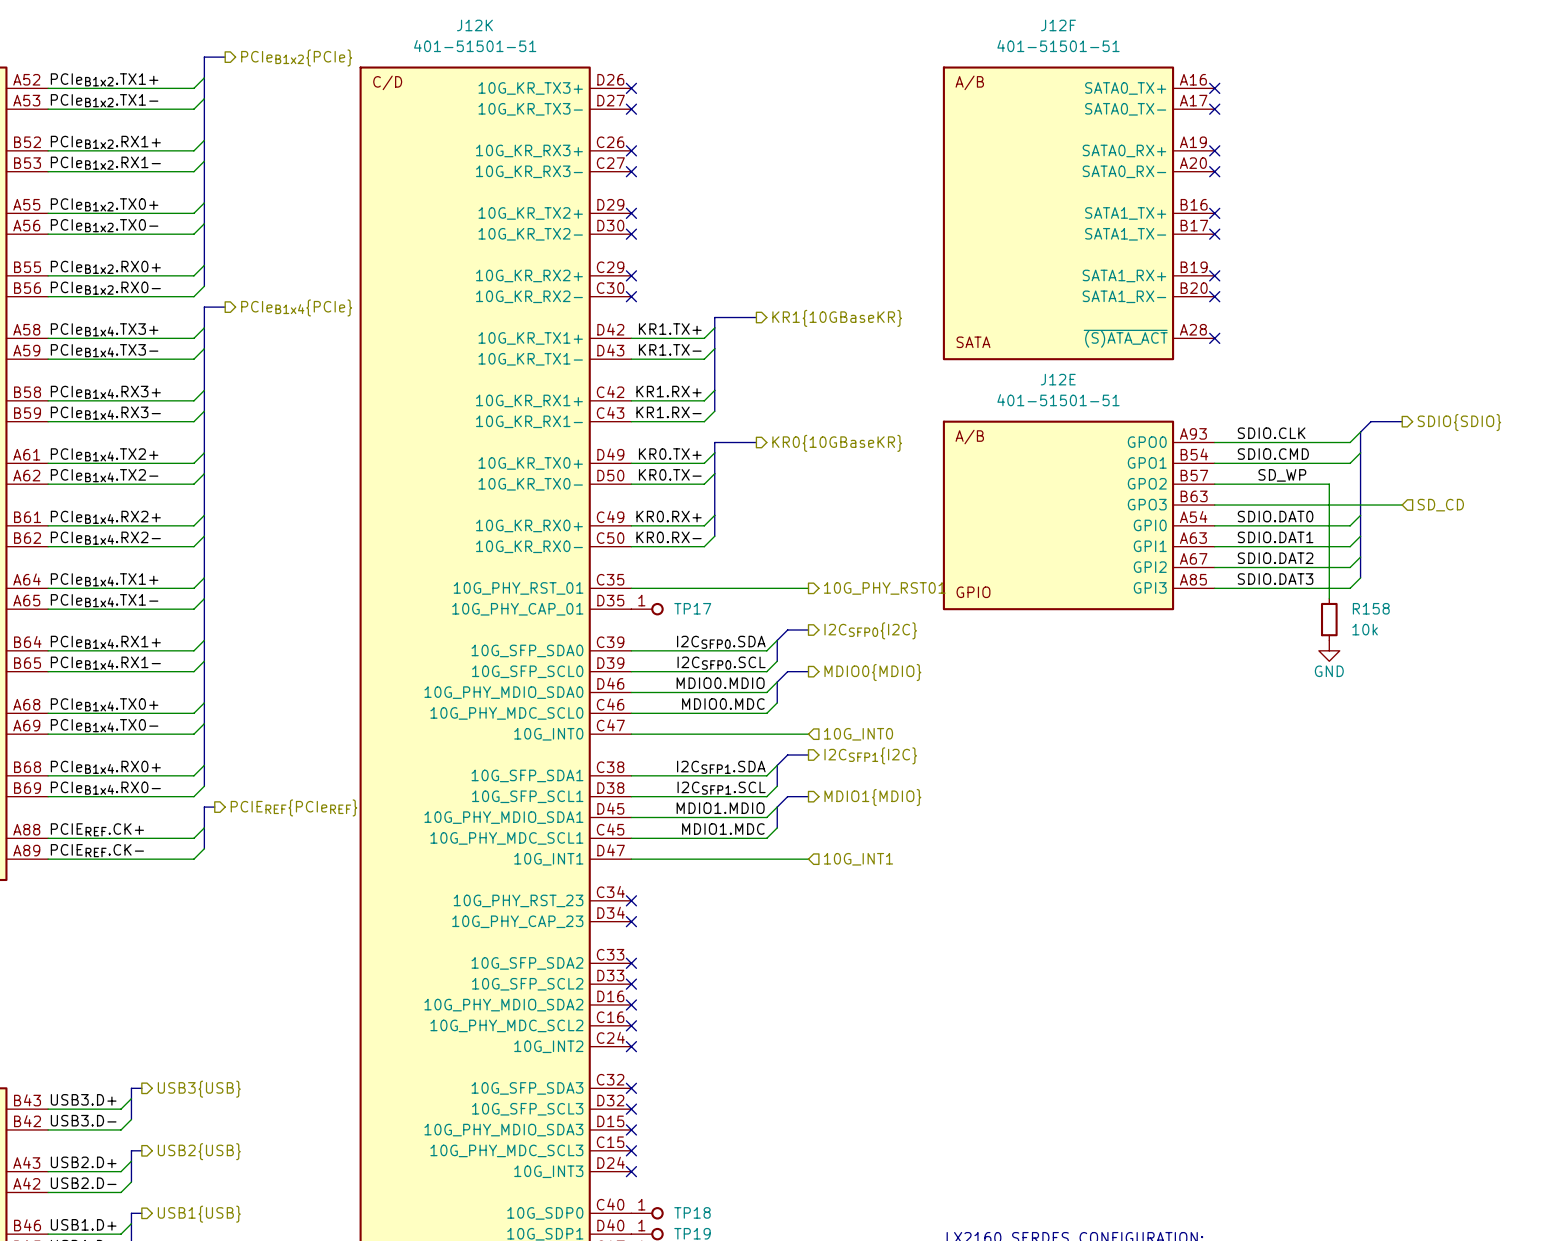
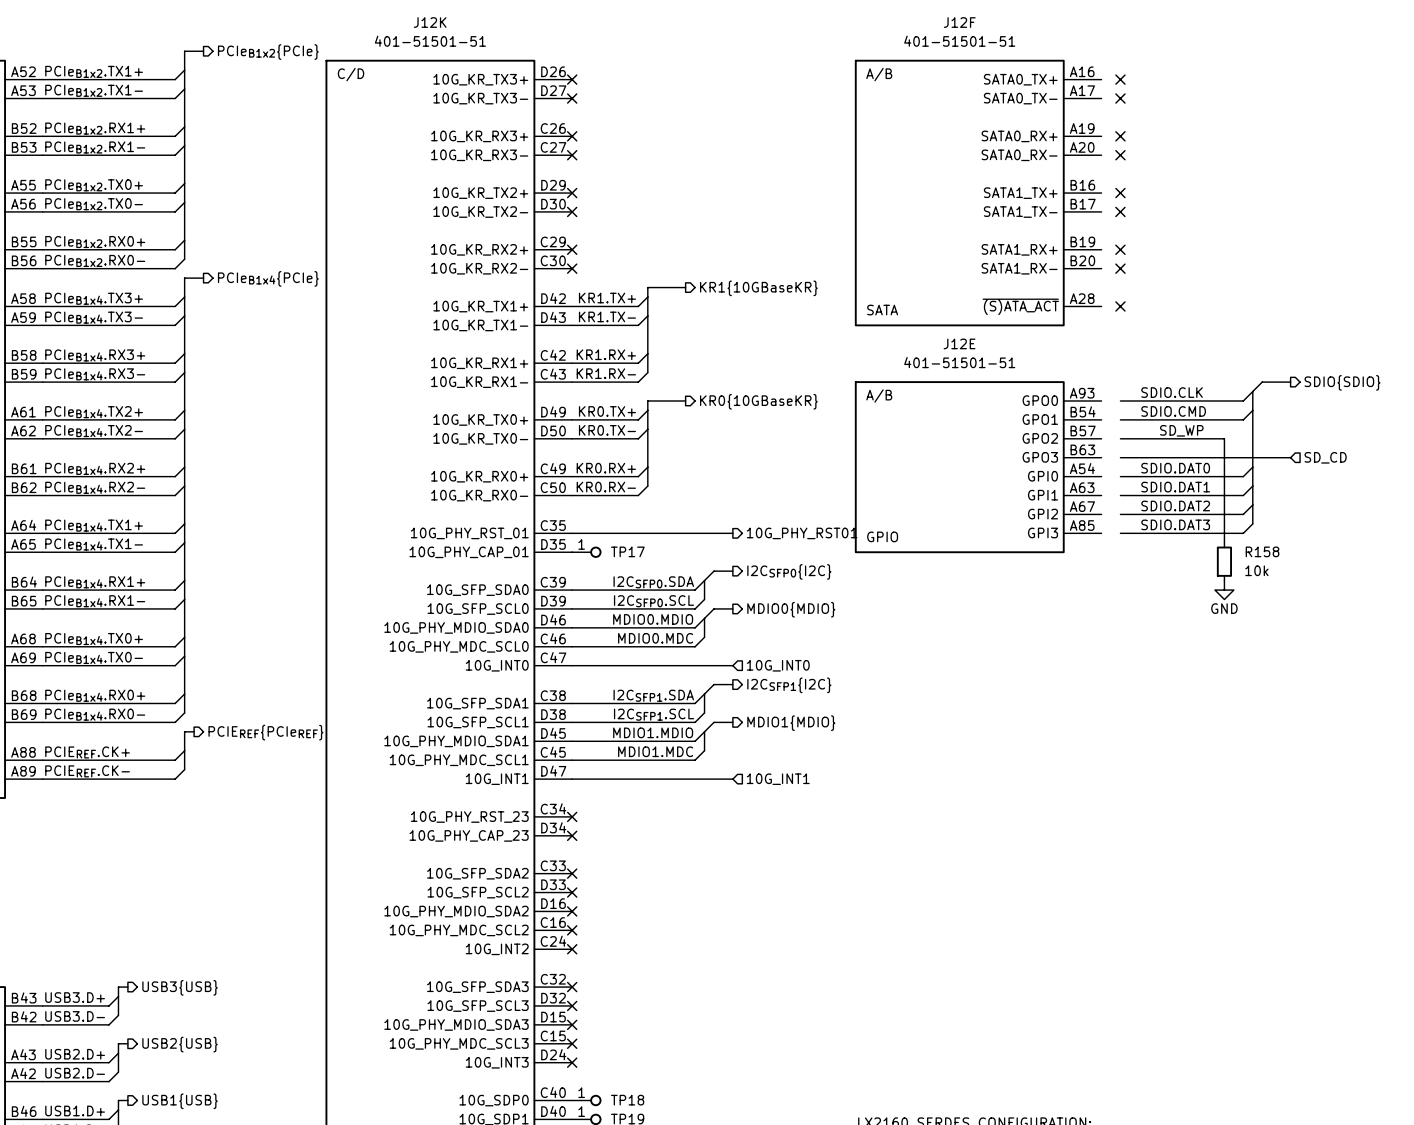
no-connect mark: (1214, 88) -> none
no-connect mark: none -> (1120, 79)
no-connect mark: (1214, 109) -> none
no-connect mark: none -> (1120, 98)
no-connect mark: (1214, 150) -> none
no-connect mark: none -> (1120, 136)
no-connect mark: (1214, 171) -> none
no-connect mark: none -> (1120, 155)
no-connect mark: (1214, 213) -> none
no-connect mark: none -> (1120, 193)
no-connect mark: (1214, 234) -> none
no-connect mark: none -> (1120, 211)
no-connect mark: (1214, 275) -> none
no-connect mark: none -> (1120, 249)
no-connect mark: (1214, 296) -> none
no-connect mark: none -> (1120, 268)
no-connect mark position: (1214, 338) -> (1120, 306)
bus: (1391, 421) (1370, 421) (1360, 432) (1360, 577) -> (1262, 382) (1252, 391) (1252, 523)
bus: none -> (1271, 382) (1290, 382)
hierarchical label position: SDIO{SDIO} (1459, 422) -> SDIO{SDIO} (1342, 382)
wire: (1360, 432) (1350, 442) -> (1252, 391) (1243, 401) (1224, 401)
label position: SDIO.CLK (1271, 433) -> SDIO.CLK (1172, 392)
wire: (1214, 442) (1235, 442) -> none
wire: (1360, 452) (1350, 463) -> (1252, 410) (1243, 419) (1224, 419)
label position: SDIO.CMD (1273, 454) -> SDIO.CMD (1173, 411)
wire: (1214, 463) (1235, 463) -> none
label position: SD_WP (1282, 475) -> SD_WP (1181, 430)
wire: (1214, 484) (1235, 484) -> none
wire: (1329, 484) (1329, 598) -> (1205, 438) (1224, 438) (1224, 542)
wire: (1214, 505) (1235, 505) -> (1271, 457) (1290, 457)
hierarchical label position: SD_CD (1440, 505) -> SD_CD (1325, 457)
wire: (1360, 515) (1350, 525) -> (1252, 467) (1243, 476) (1224, 476)
label position: SDIO.DAT0 (1275, 516) -> SDIO.DAT0 (1175, 468)
wire: (1214, 525) (1235, 525) -> none
wire: (1360, 536) (1350, 546) -> (1252, 486) (1243, 495) (1224, 495)
label position: SDIO.DAT1 (1275, 537) -> SDIO.DAT1 (1175, 487)
wire: (1214, 546) (1235, 546) -> none
wire: (1360, 557) (1350, 567) -> (1252, 504) (1243, 514) (1224, 514)
label position: SDIO.DAT2 (1275, 558) -> SDIO.DAT2 (1175, 505)
wire: (1214, 567) (1235, 567) -> none
wire: (1360, 577) (1350, 588) -> (1252, 523) (1243, 533) (1224, 533)
label position: SDIO.DAT3 (1275, 579) -> SDIO.DAT3 (1175, 524)
wire: (1214, 588) (1235, 588) -> none
R158 position: (1329, 619) -> (1224, 561)
power symbol position: GND (1329, 650) -> GND (1224, 590)

